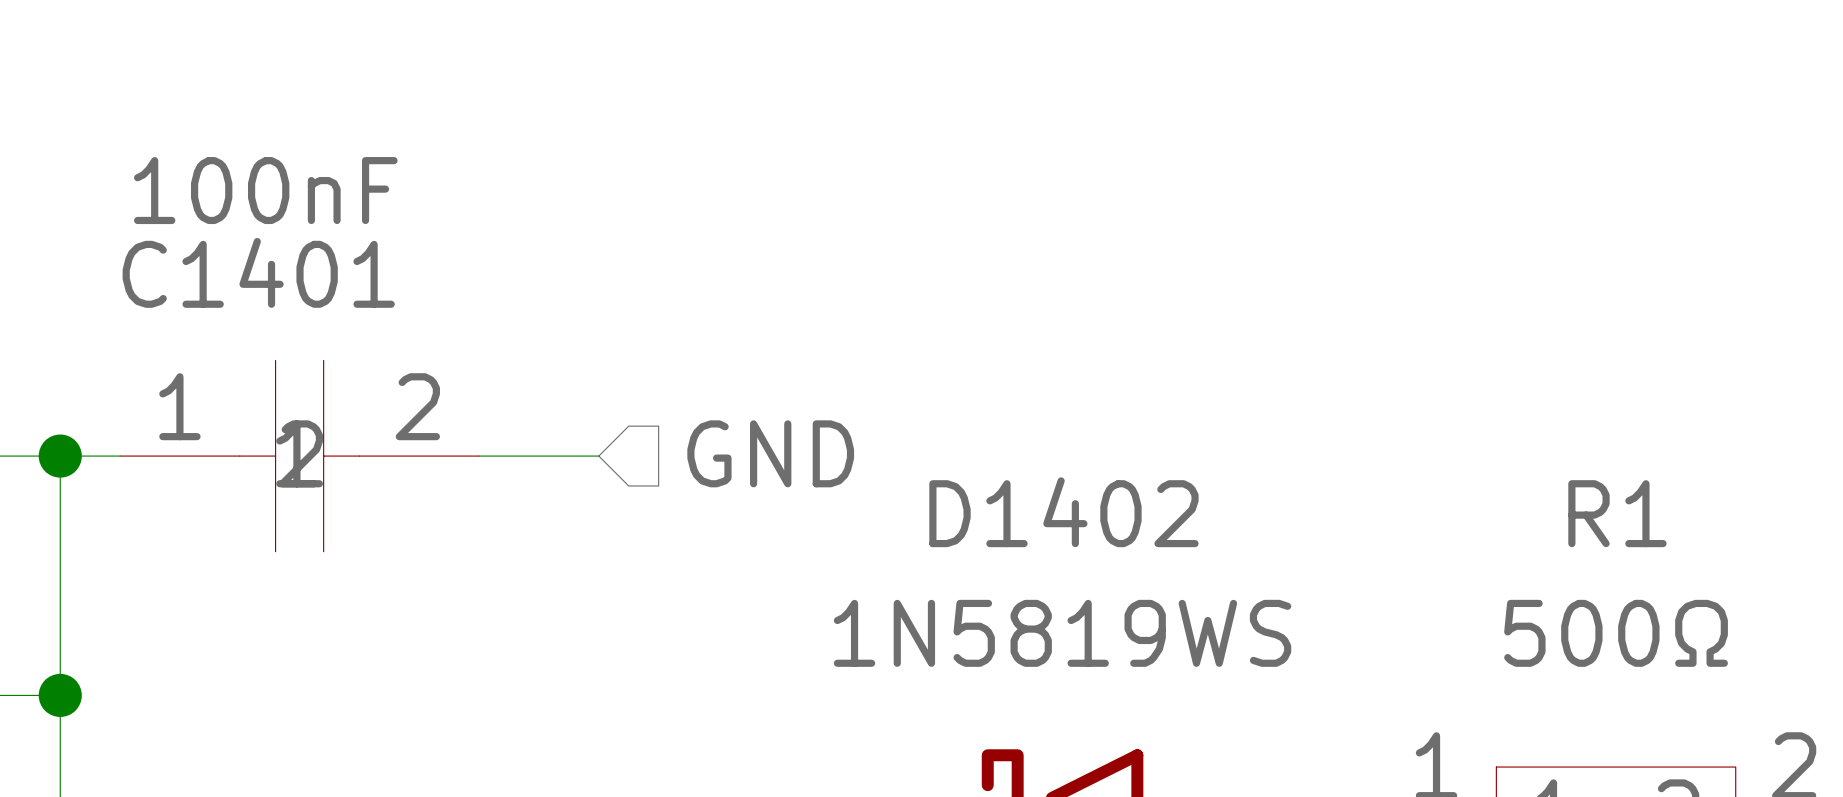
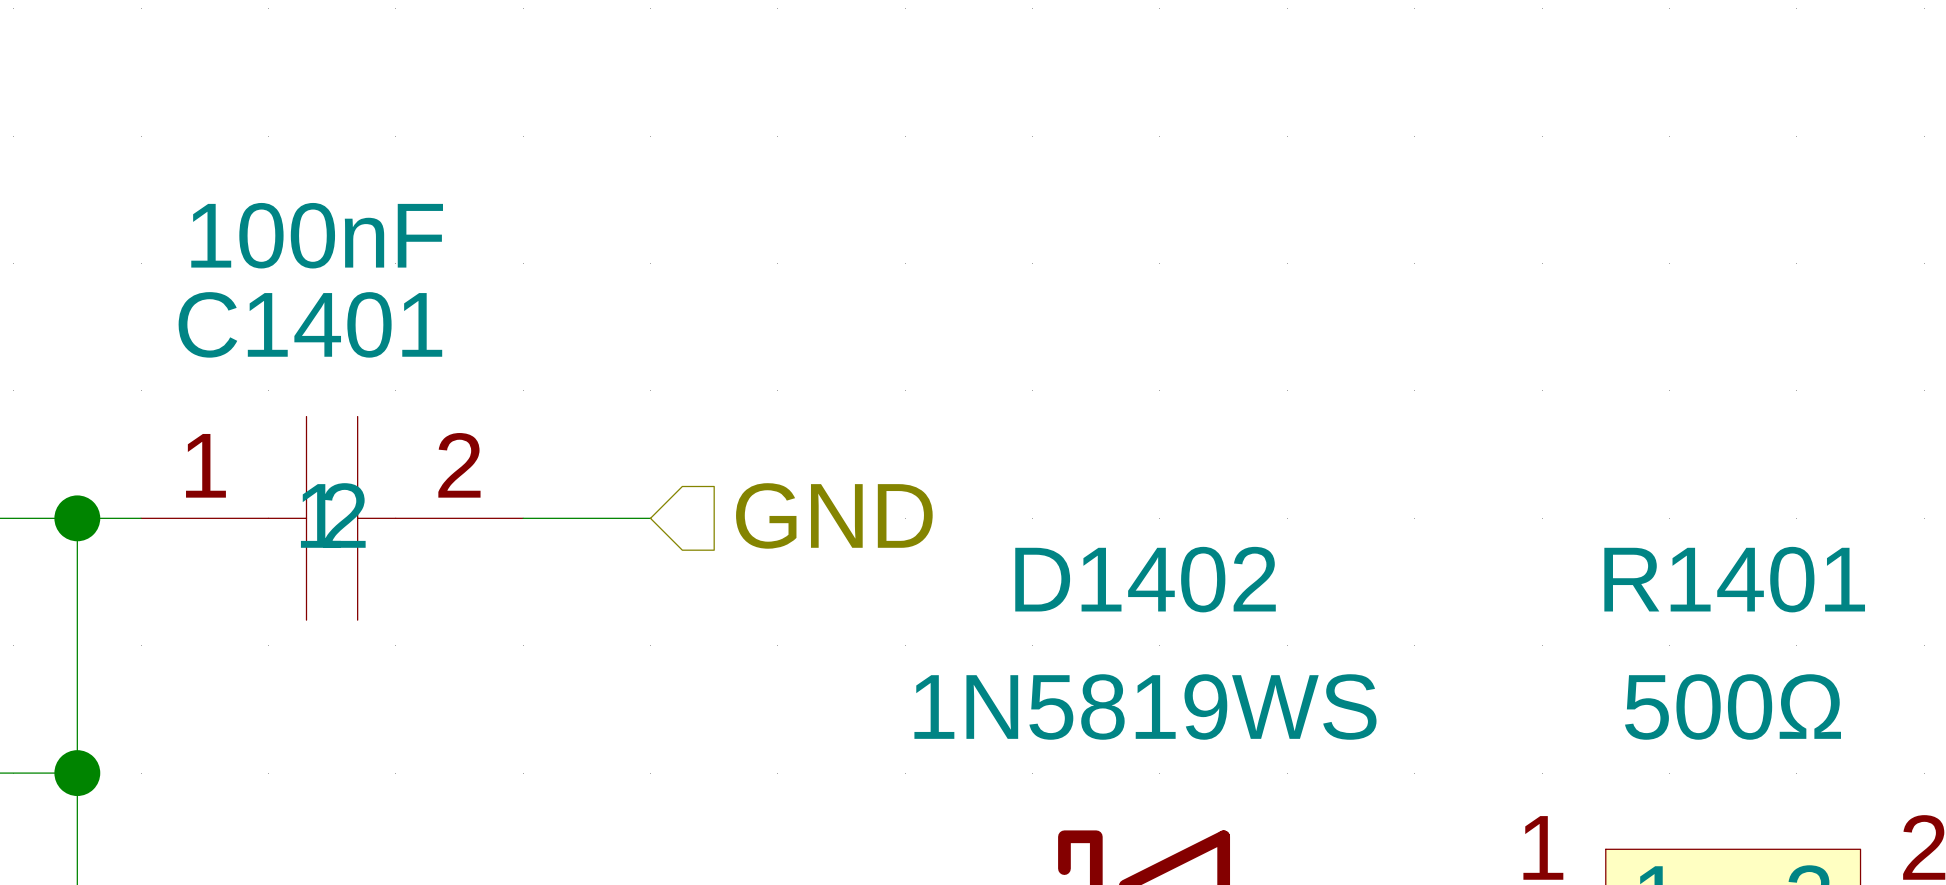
R1 name: R1 (1617, 513) -> R1401 (1734, 579)

